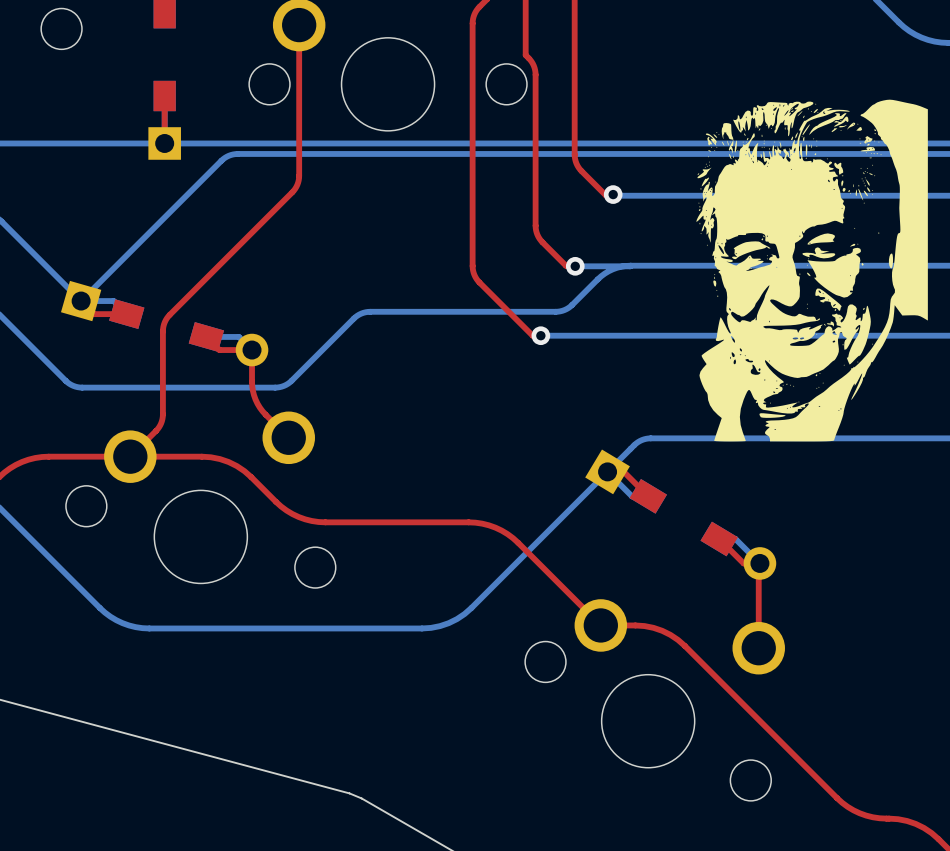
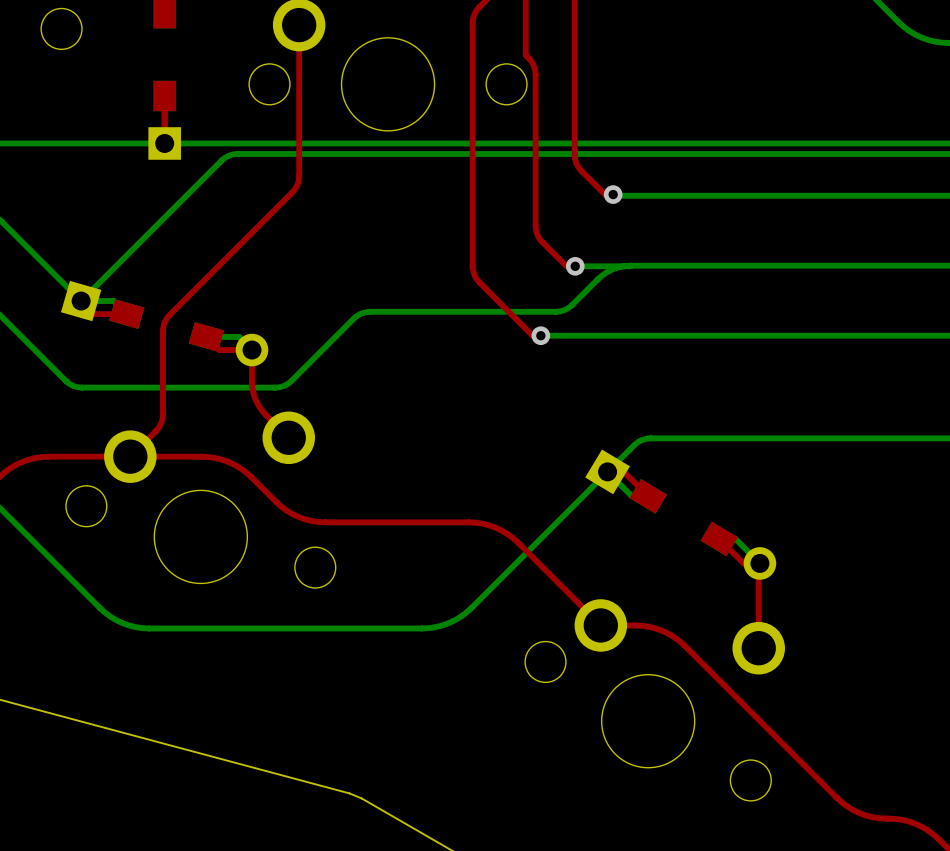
drawing: [696, 99, 928, 442] -> none

